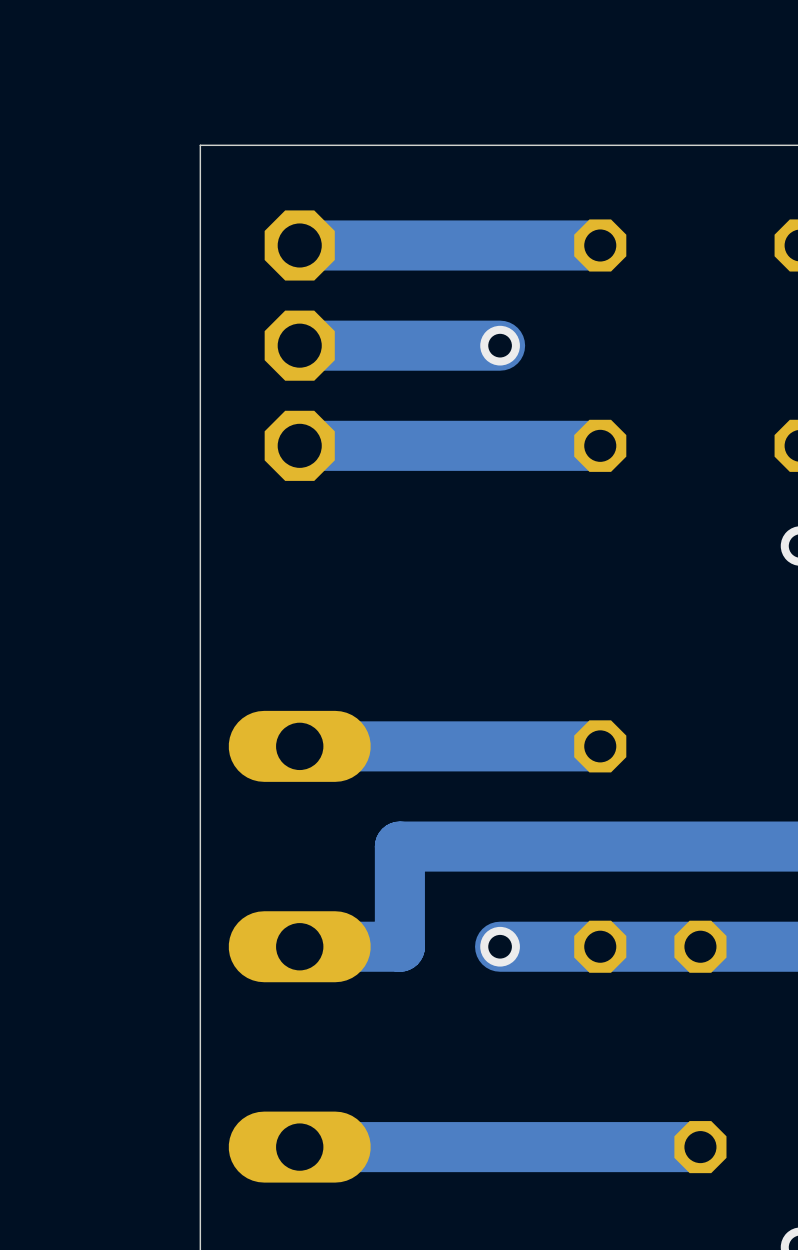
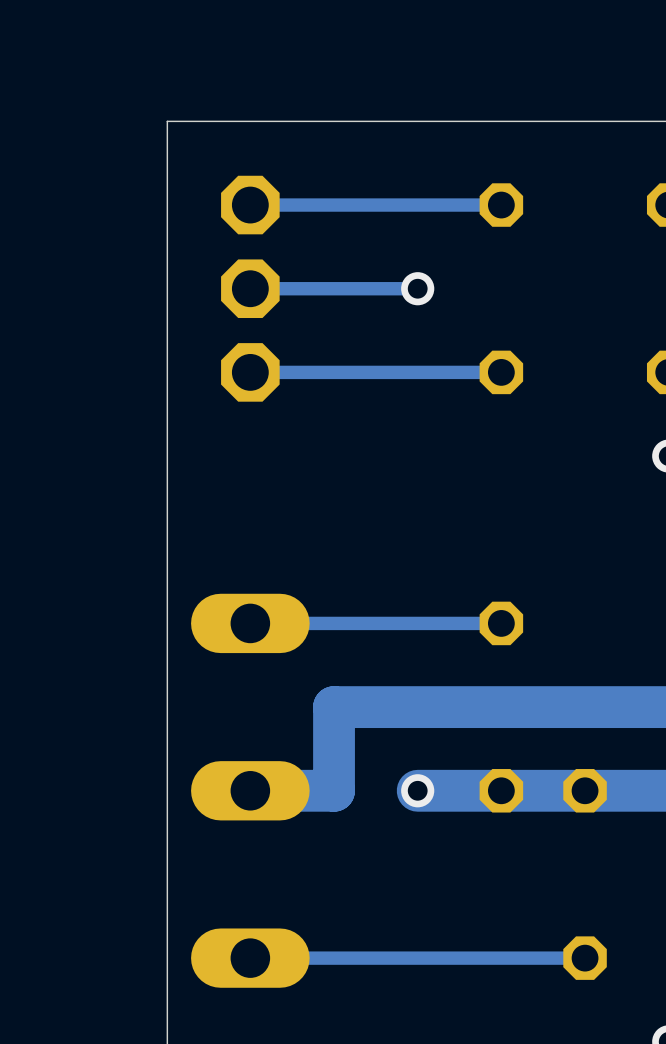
track width: thick (600, 245) (299, 245) -> thin (501, 205) (250, 205)
track width: thick (500, 345) (299, 345) -> thin (417, 288) (250, 288)
track width: thick (600, 445) (299, 445) -> thin (501, 372) (250, 372)
track width: thick (600, 746) (299, 746) -> thin (501, 623) (250, 623)
track width: thick (700, 1147) (299, 1147) -> thin (585, 958) (250, 958)

